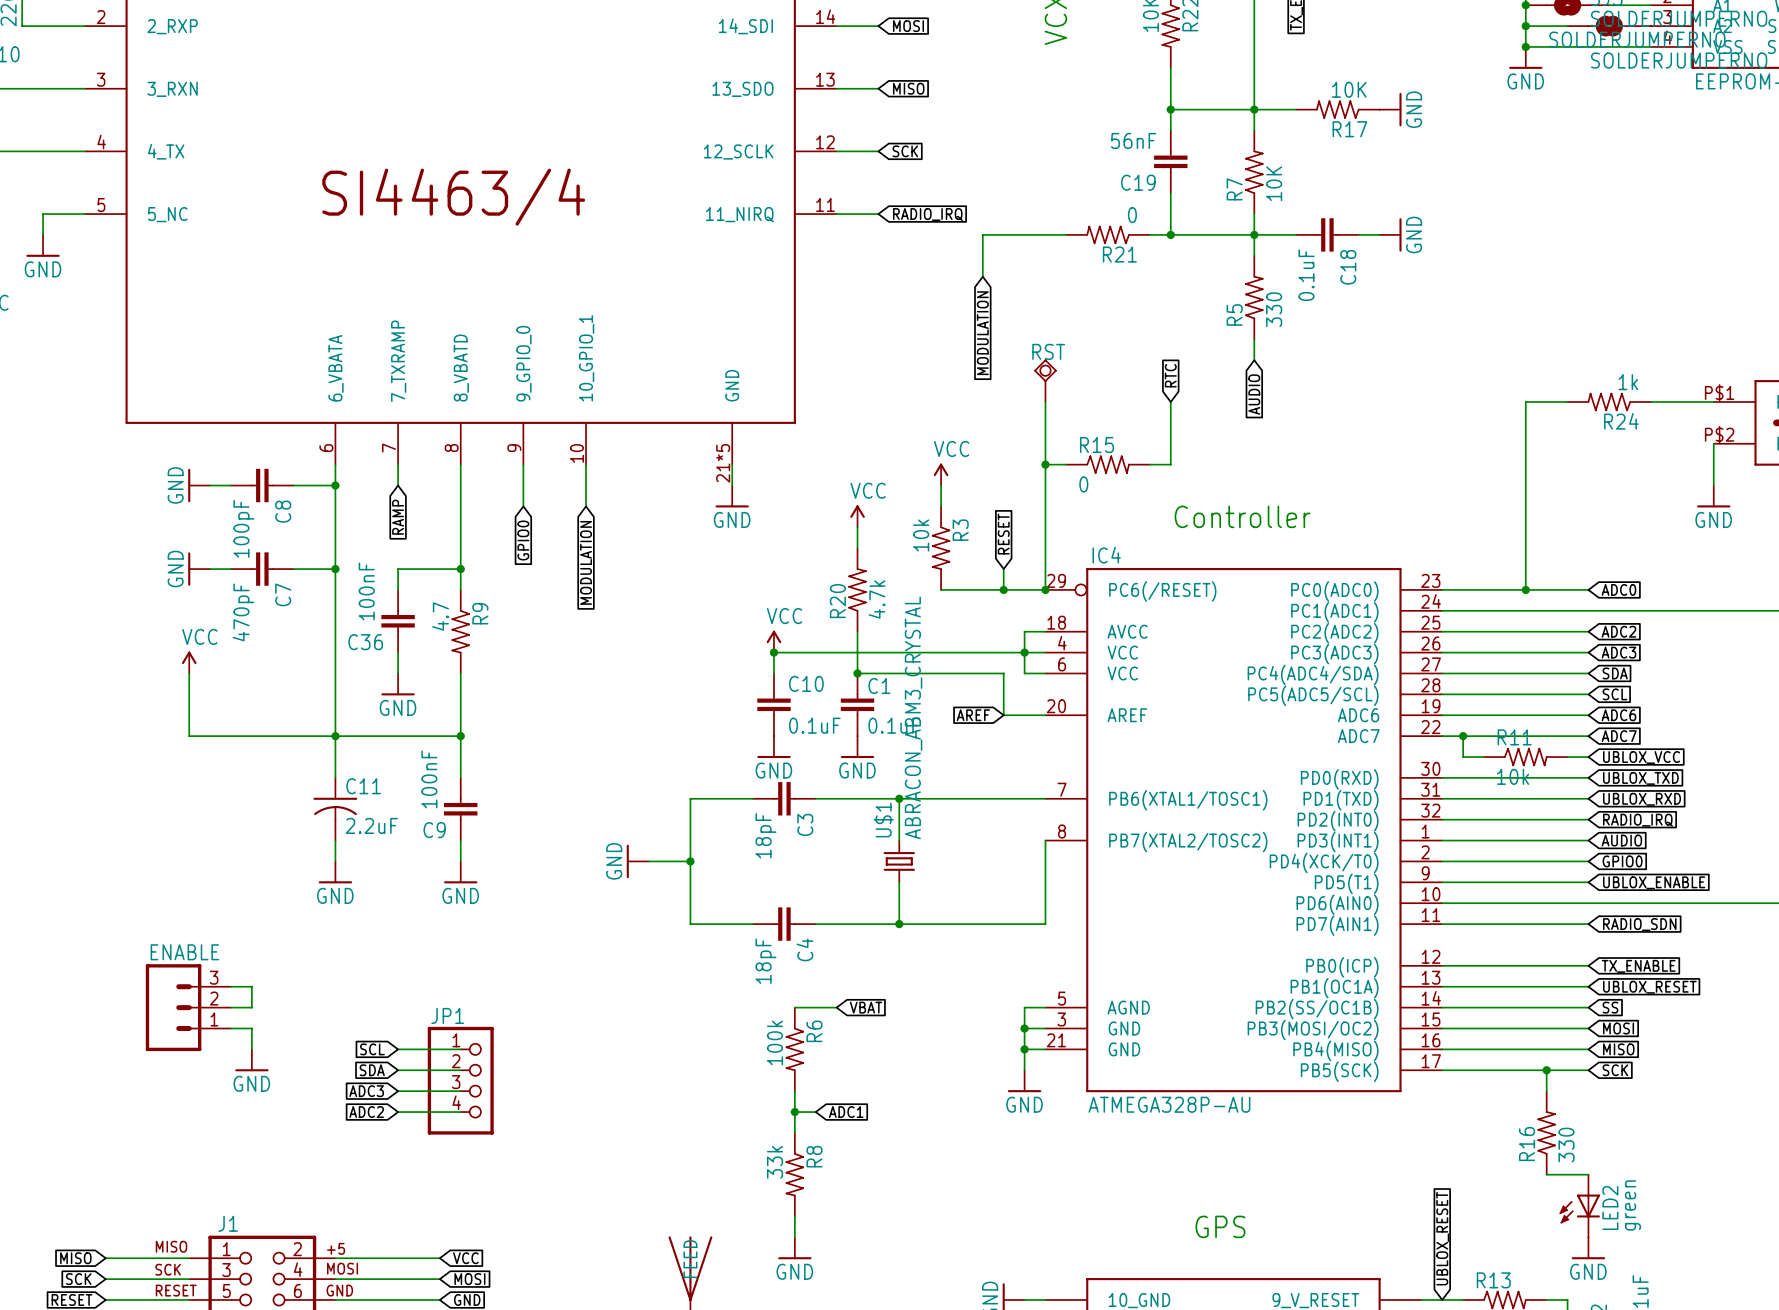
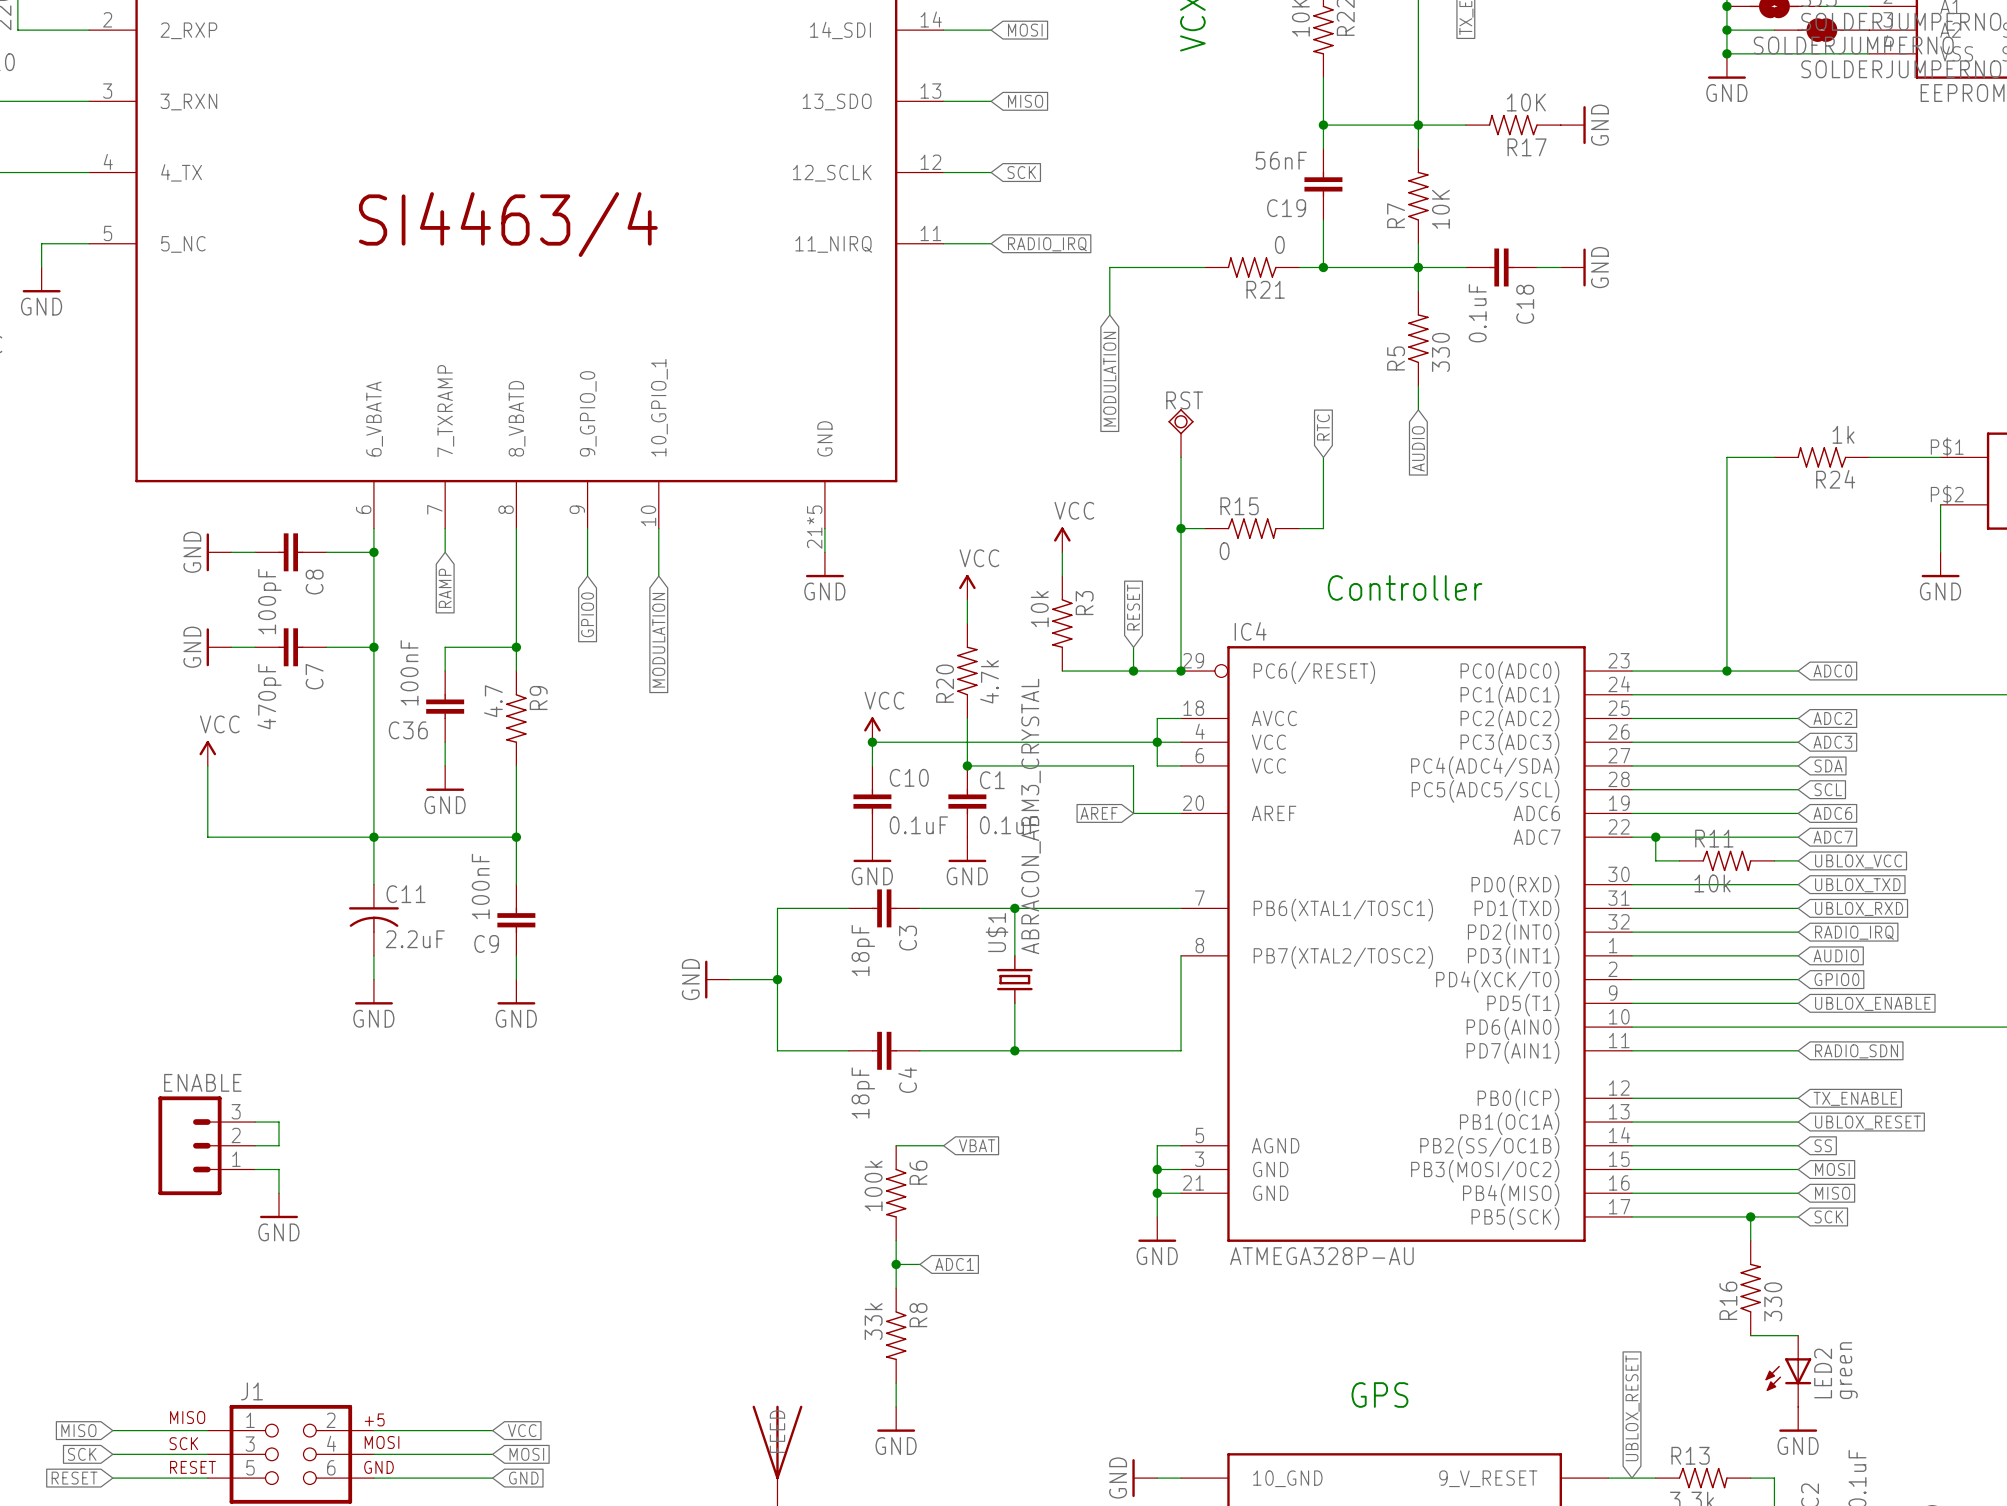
global label: SCL (372, 1049) -> none
wire: (398, 1049) (460, 1049) -> none
global label: SDA (372, 1070) -> none
wire: (398, 1070) (460, 1070) -> none
JP1: (460, 1080) -> none
global label: ADC3 (366, 1091) -> none
wire: (398, 1091) (460, 1091) -> none
global label: ADC2 (366, 1112) -> none
wire: (398, 1112) (460, 1112) -> none

